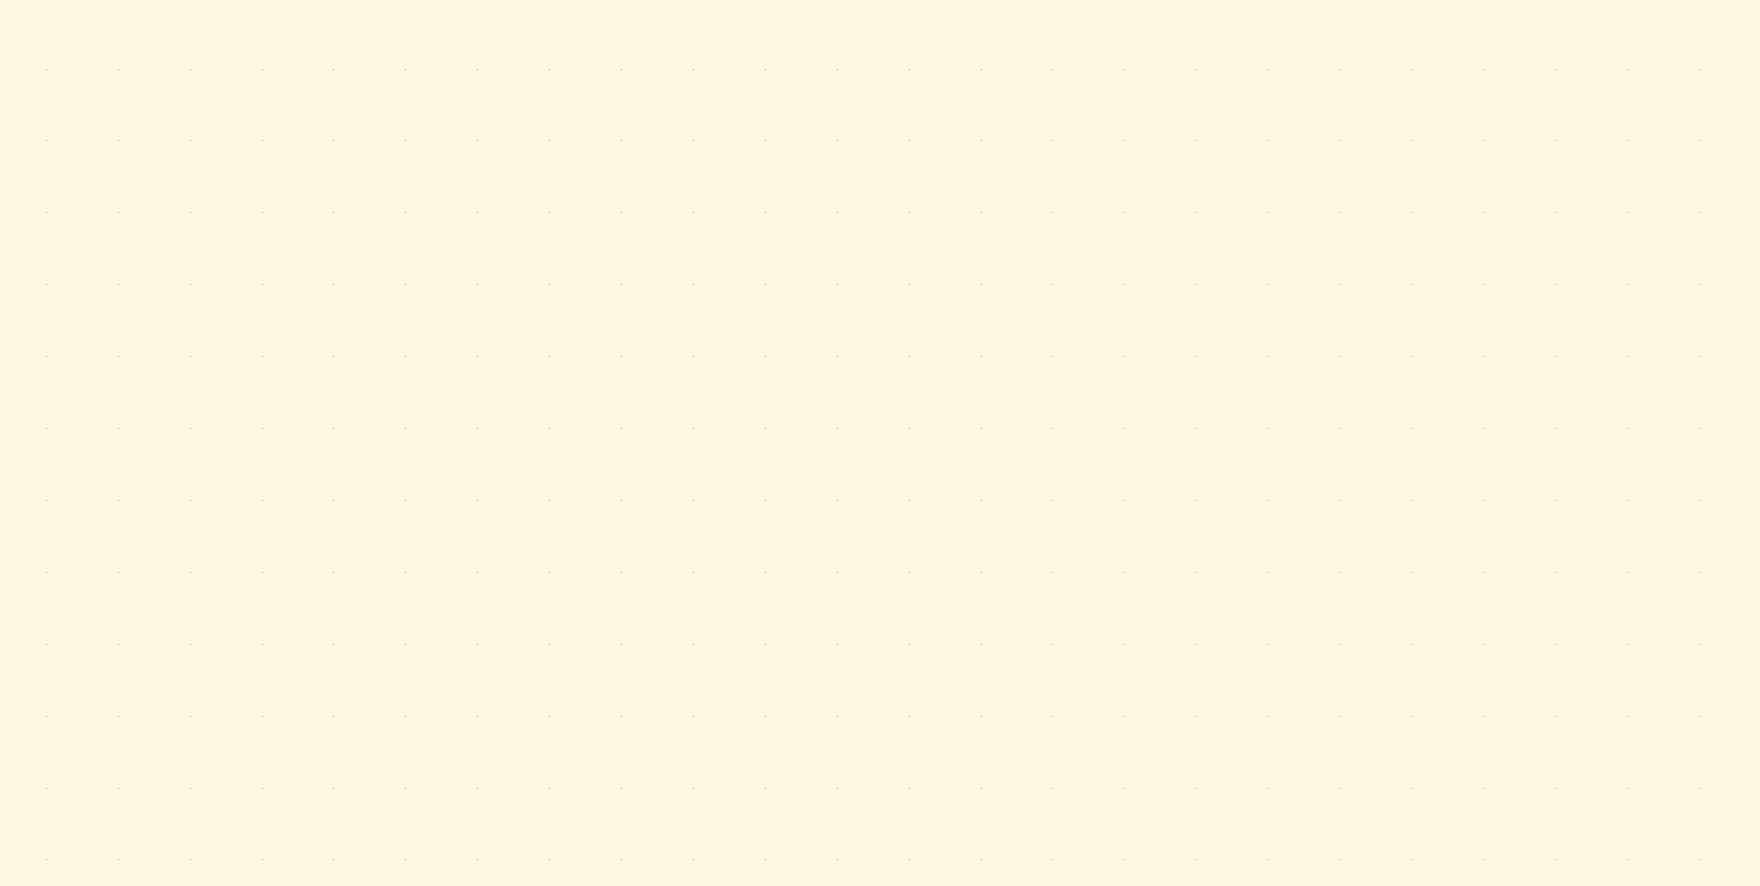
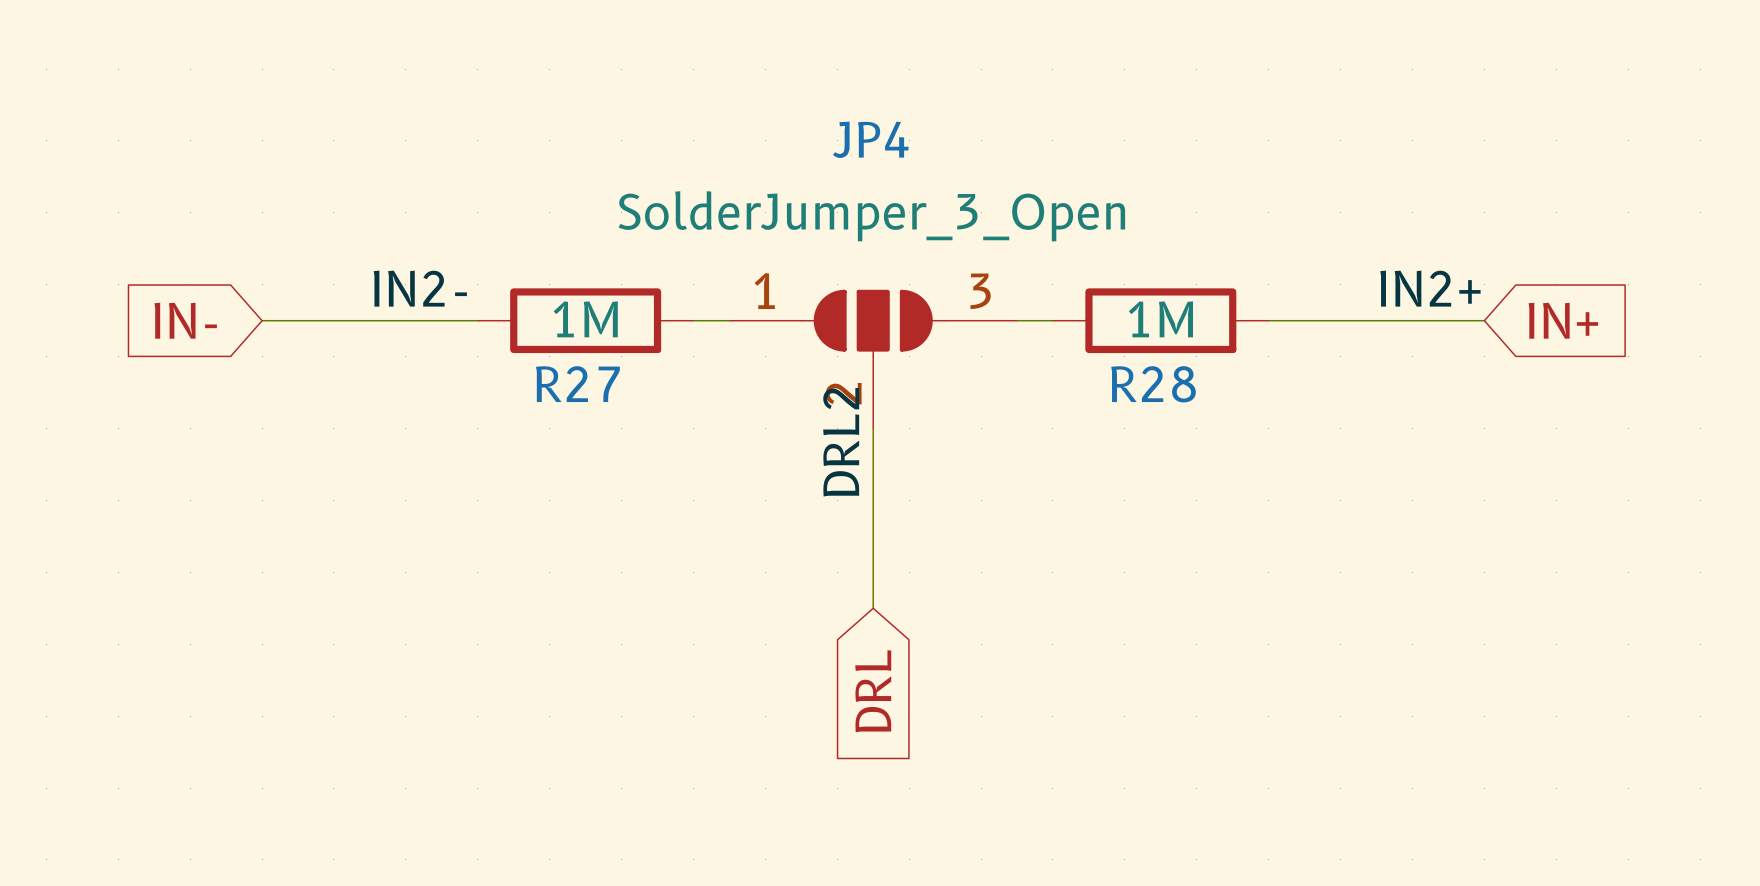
label: none -> IN2- (420, 288)
label: none -> IN2+ (1430, 288)
global label: none -> IN- (185, 320)
wire: none -> (262, 320) (477, 320)
R27: none -> 1M (585, 320)
wire: none -> (693, 320) (729, 320)
wire: none -> (1017, 320) (1052, 320)
R28: none -> 1M (1160, 320)
wire: none -> (1268, 320) (1484, 320)
global label: none -> IN+ (1563, 320)
JP4: none -> SolderJumper_3_Open (873, 359)
wire: none -> (873, 428) (873, 608)
label: none -> DRL2 (841, 442)
global label: none -> DRL (873, 691)

